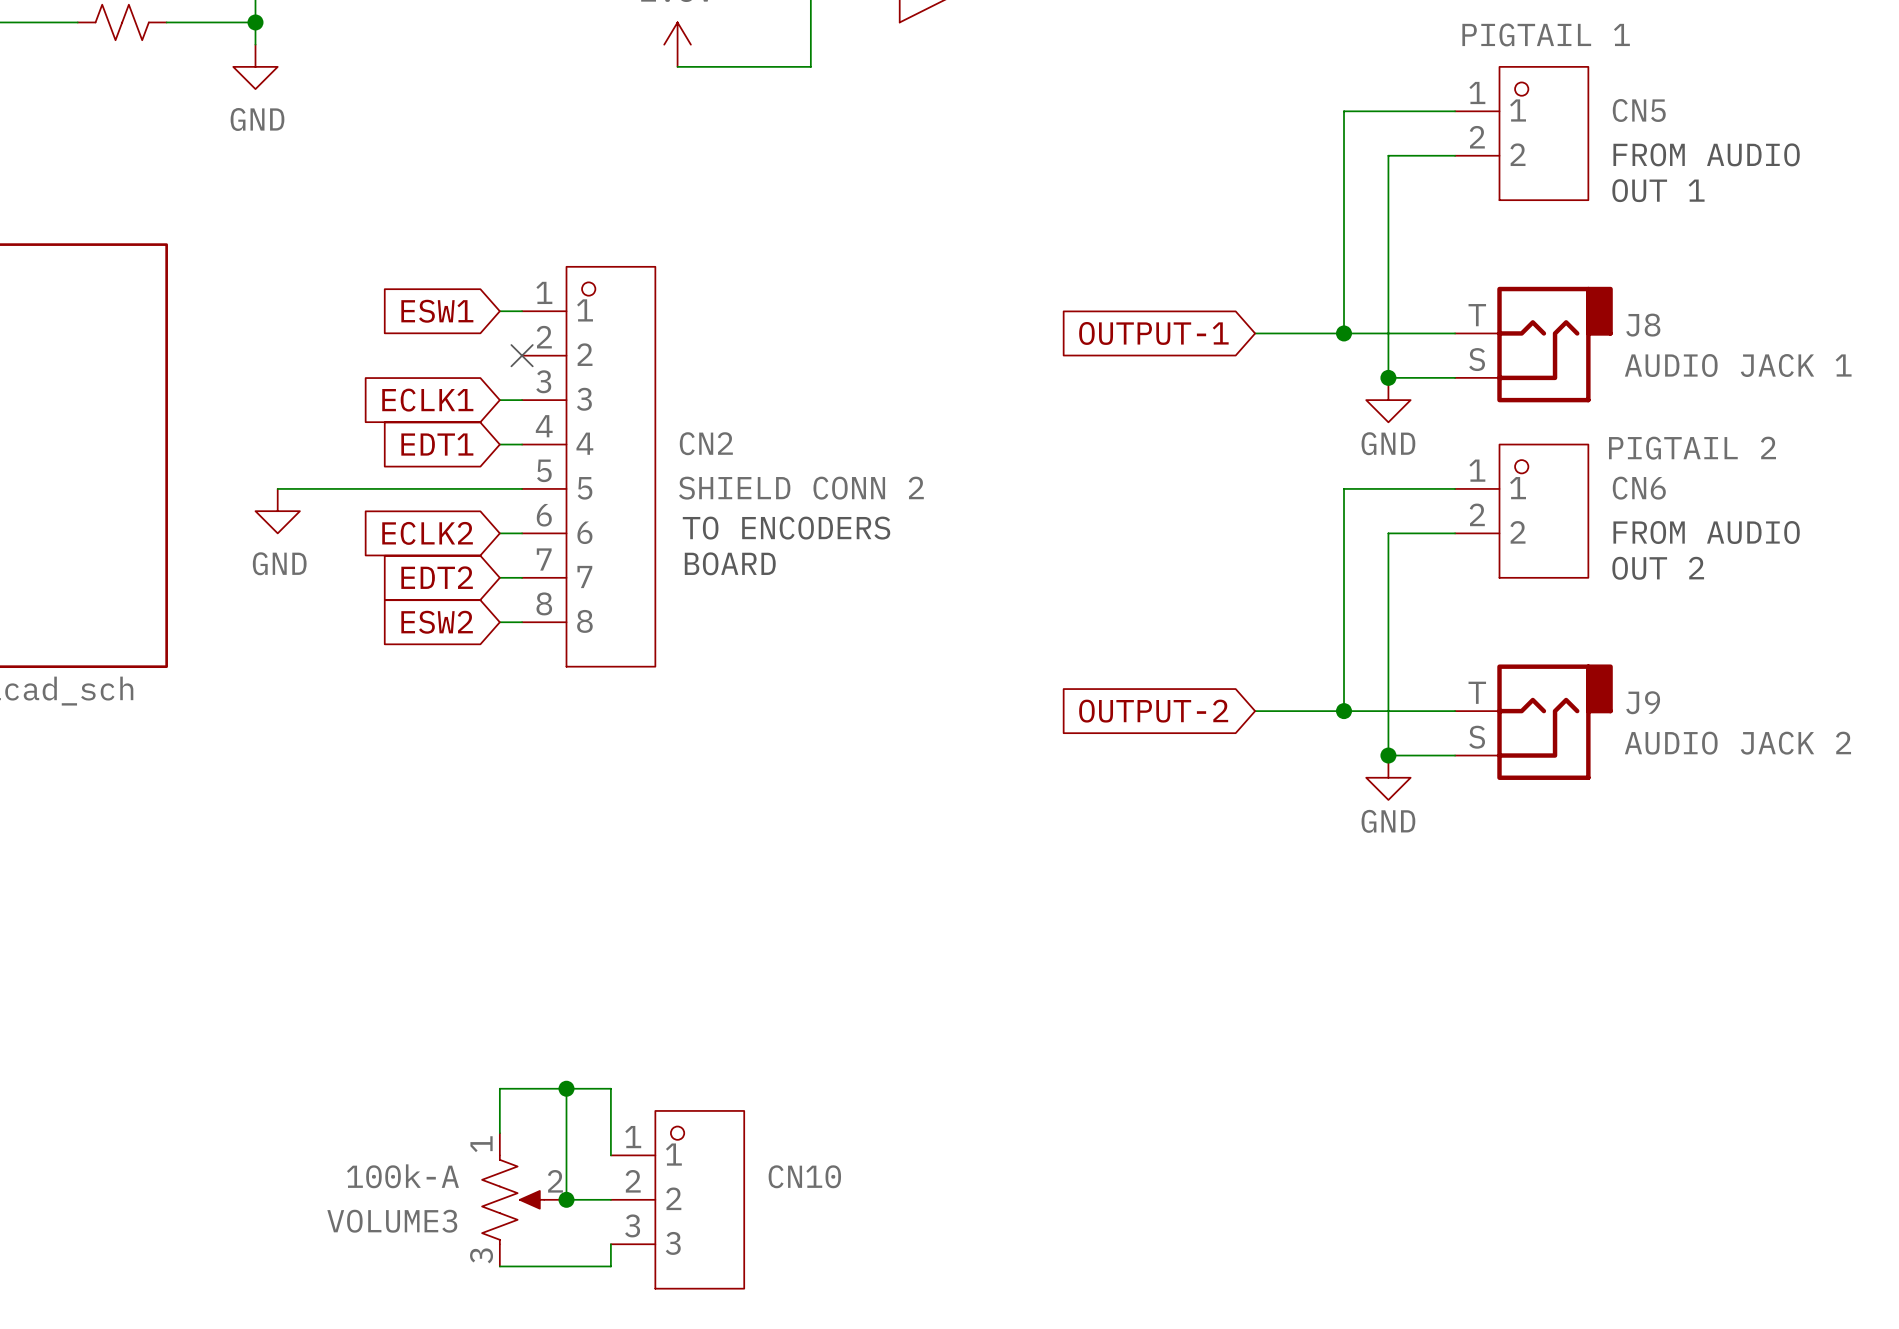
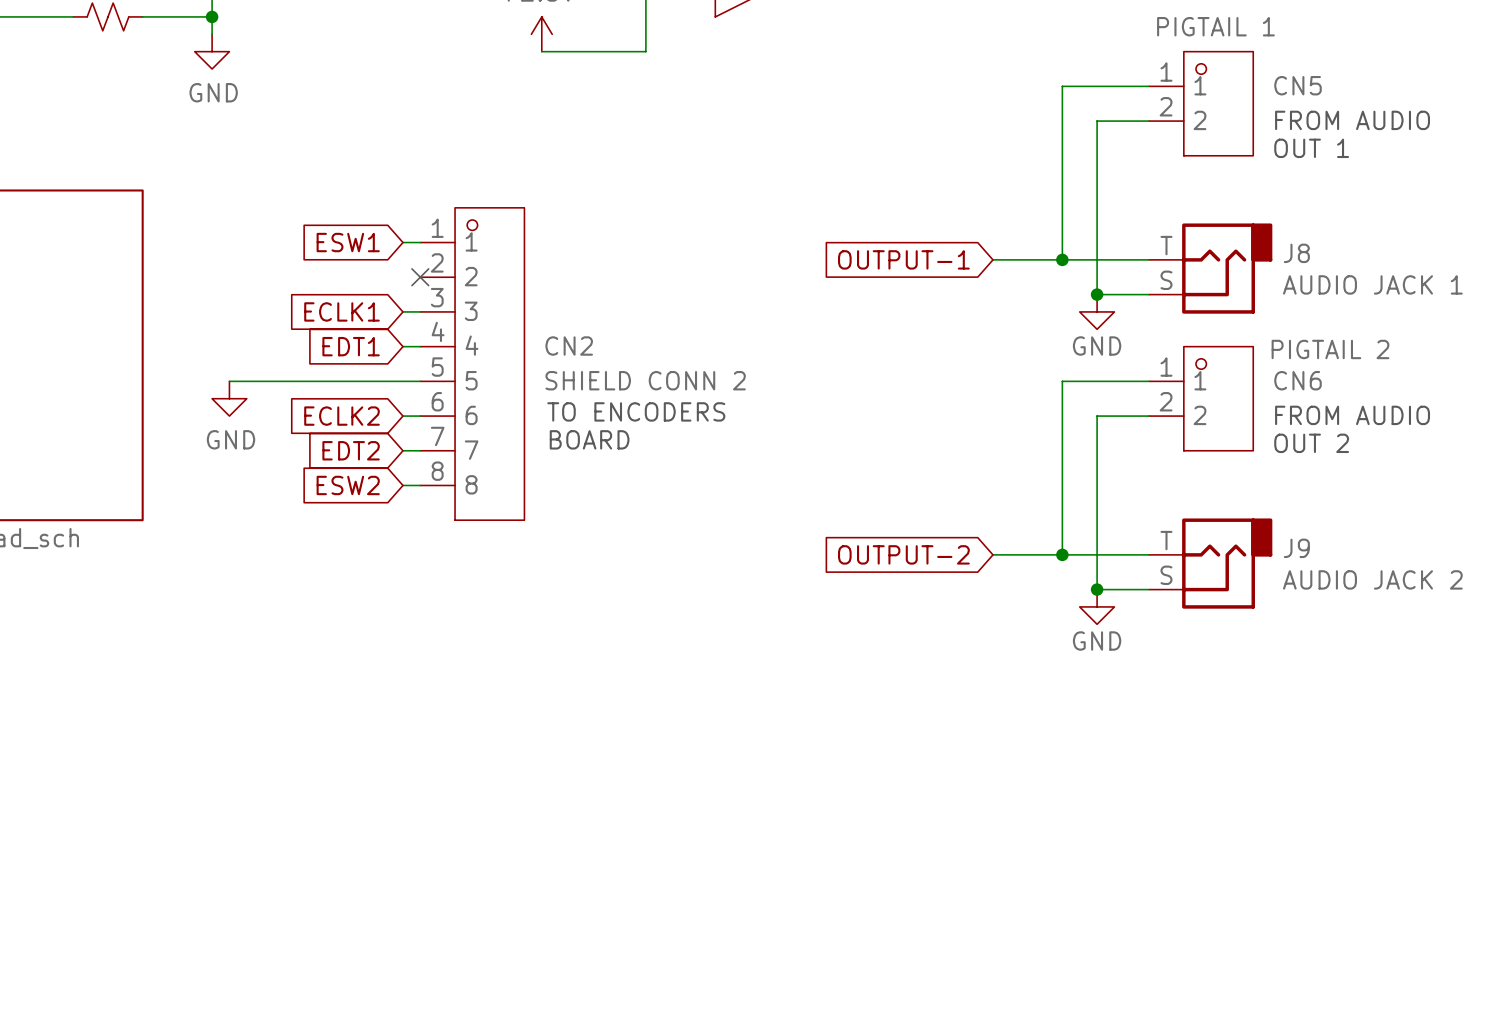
wire: (566, 1088) (566, 1199) (610, 1199) -> none
junction: (566, 1088) -> none
wire: (499, 1133) (499, 1088) (610, 1088) (610, 1155) -> none
VOLUME3: 100k-A (524, 1199) -> none
junction: (566, 1199) -> none
CN10: (677, 1199) -> none
wire: (610, 1244) (610, 1266) (499, 1266) -> none

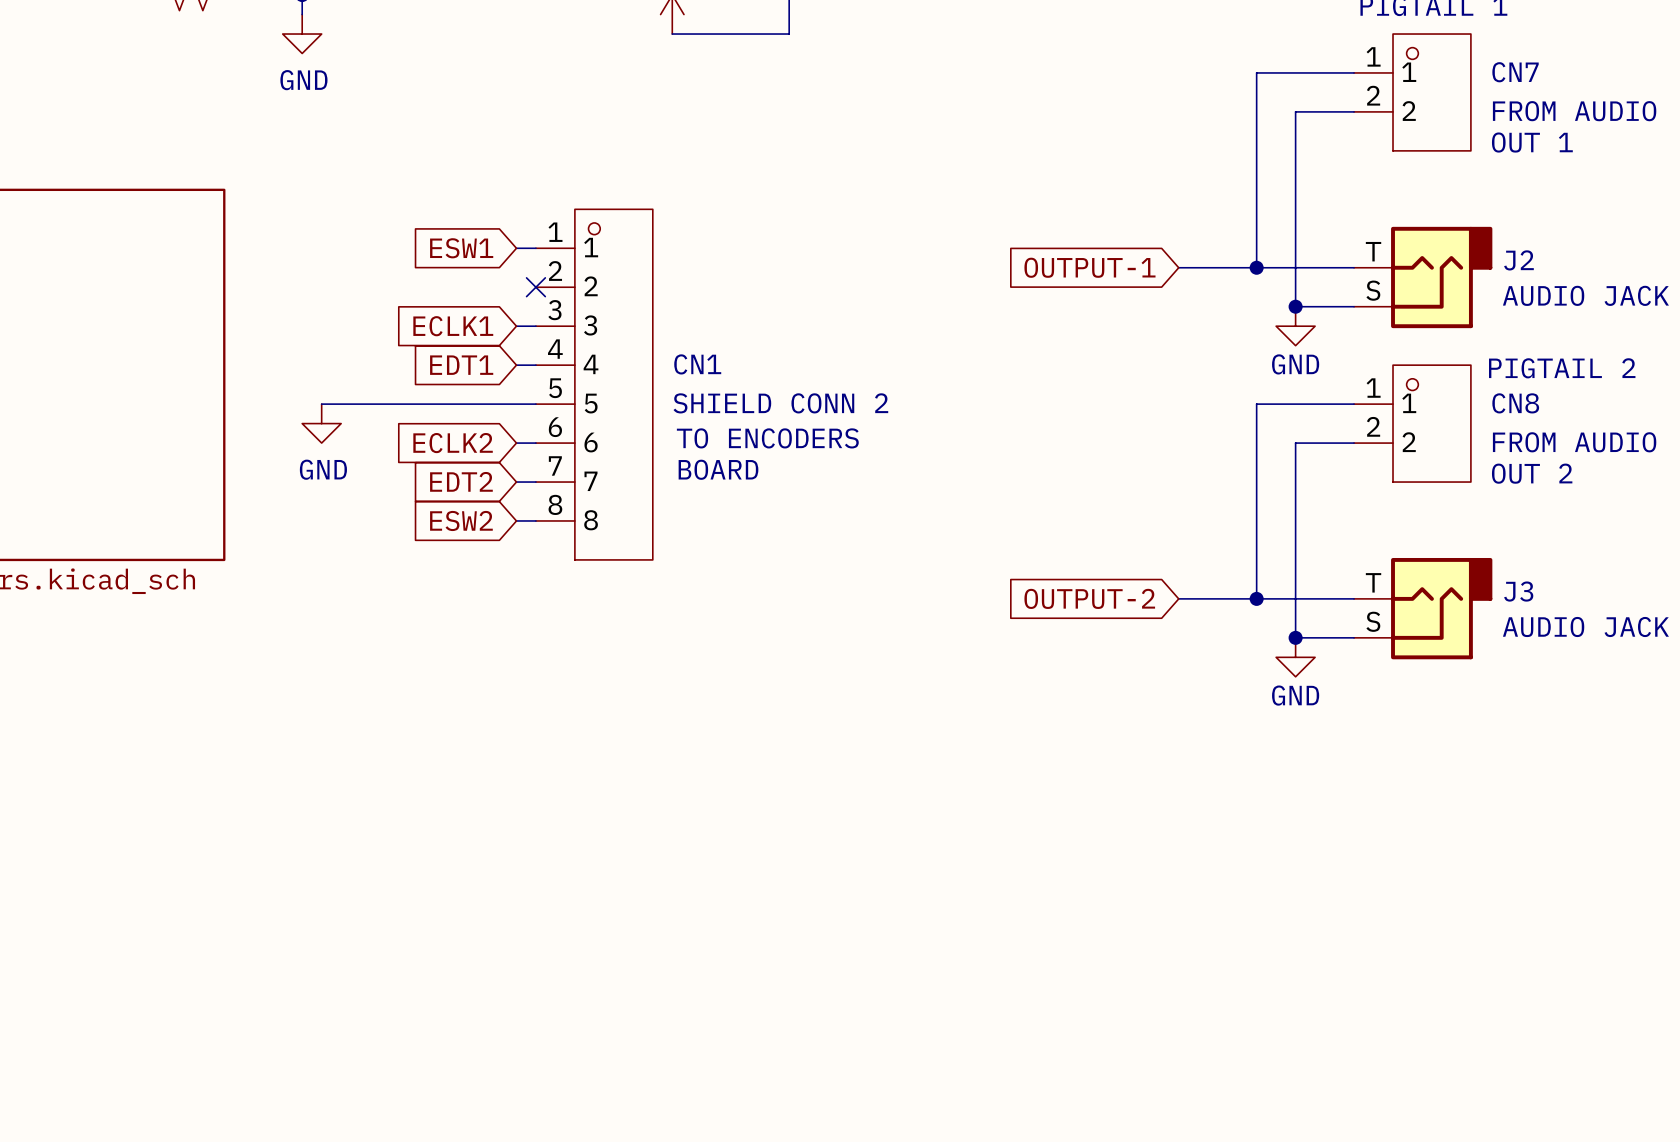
CN5 name: CN5 (1298, 85) -> CN7 (1515, 72)
J8 name: J8 (1296, 253) -> J2 (1518, 260)
CN2 name: CN2 (569, 346) -> CN1 (697, 364)
CN6 name: CN6 (1298, 380) -> CN8 (1515, 403)
J9 name: J9 (1296, 548) -> J3 (1518, 591)

